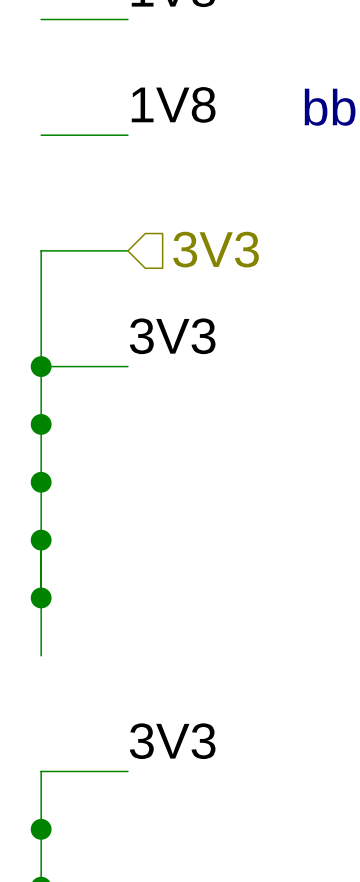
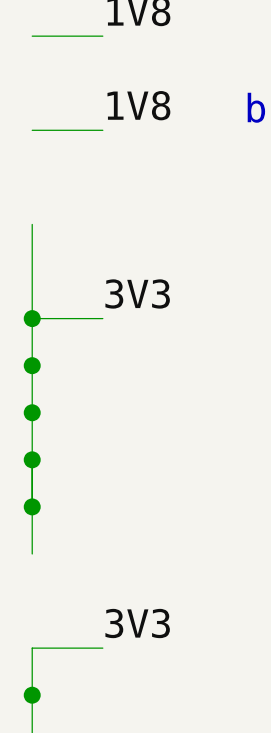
hierarchical label: 3V3 (216, 249) -> none
wire: (41, 250) (127, 250) -> none

